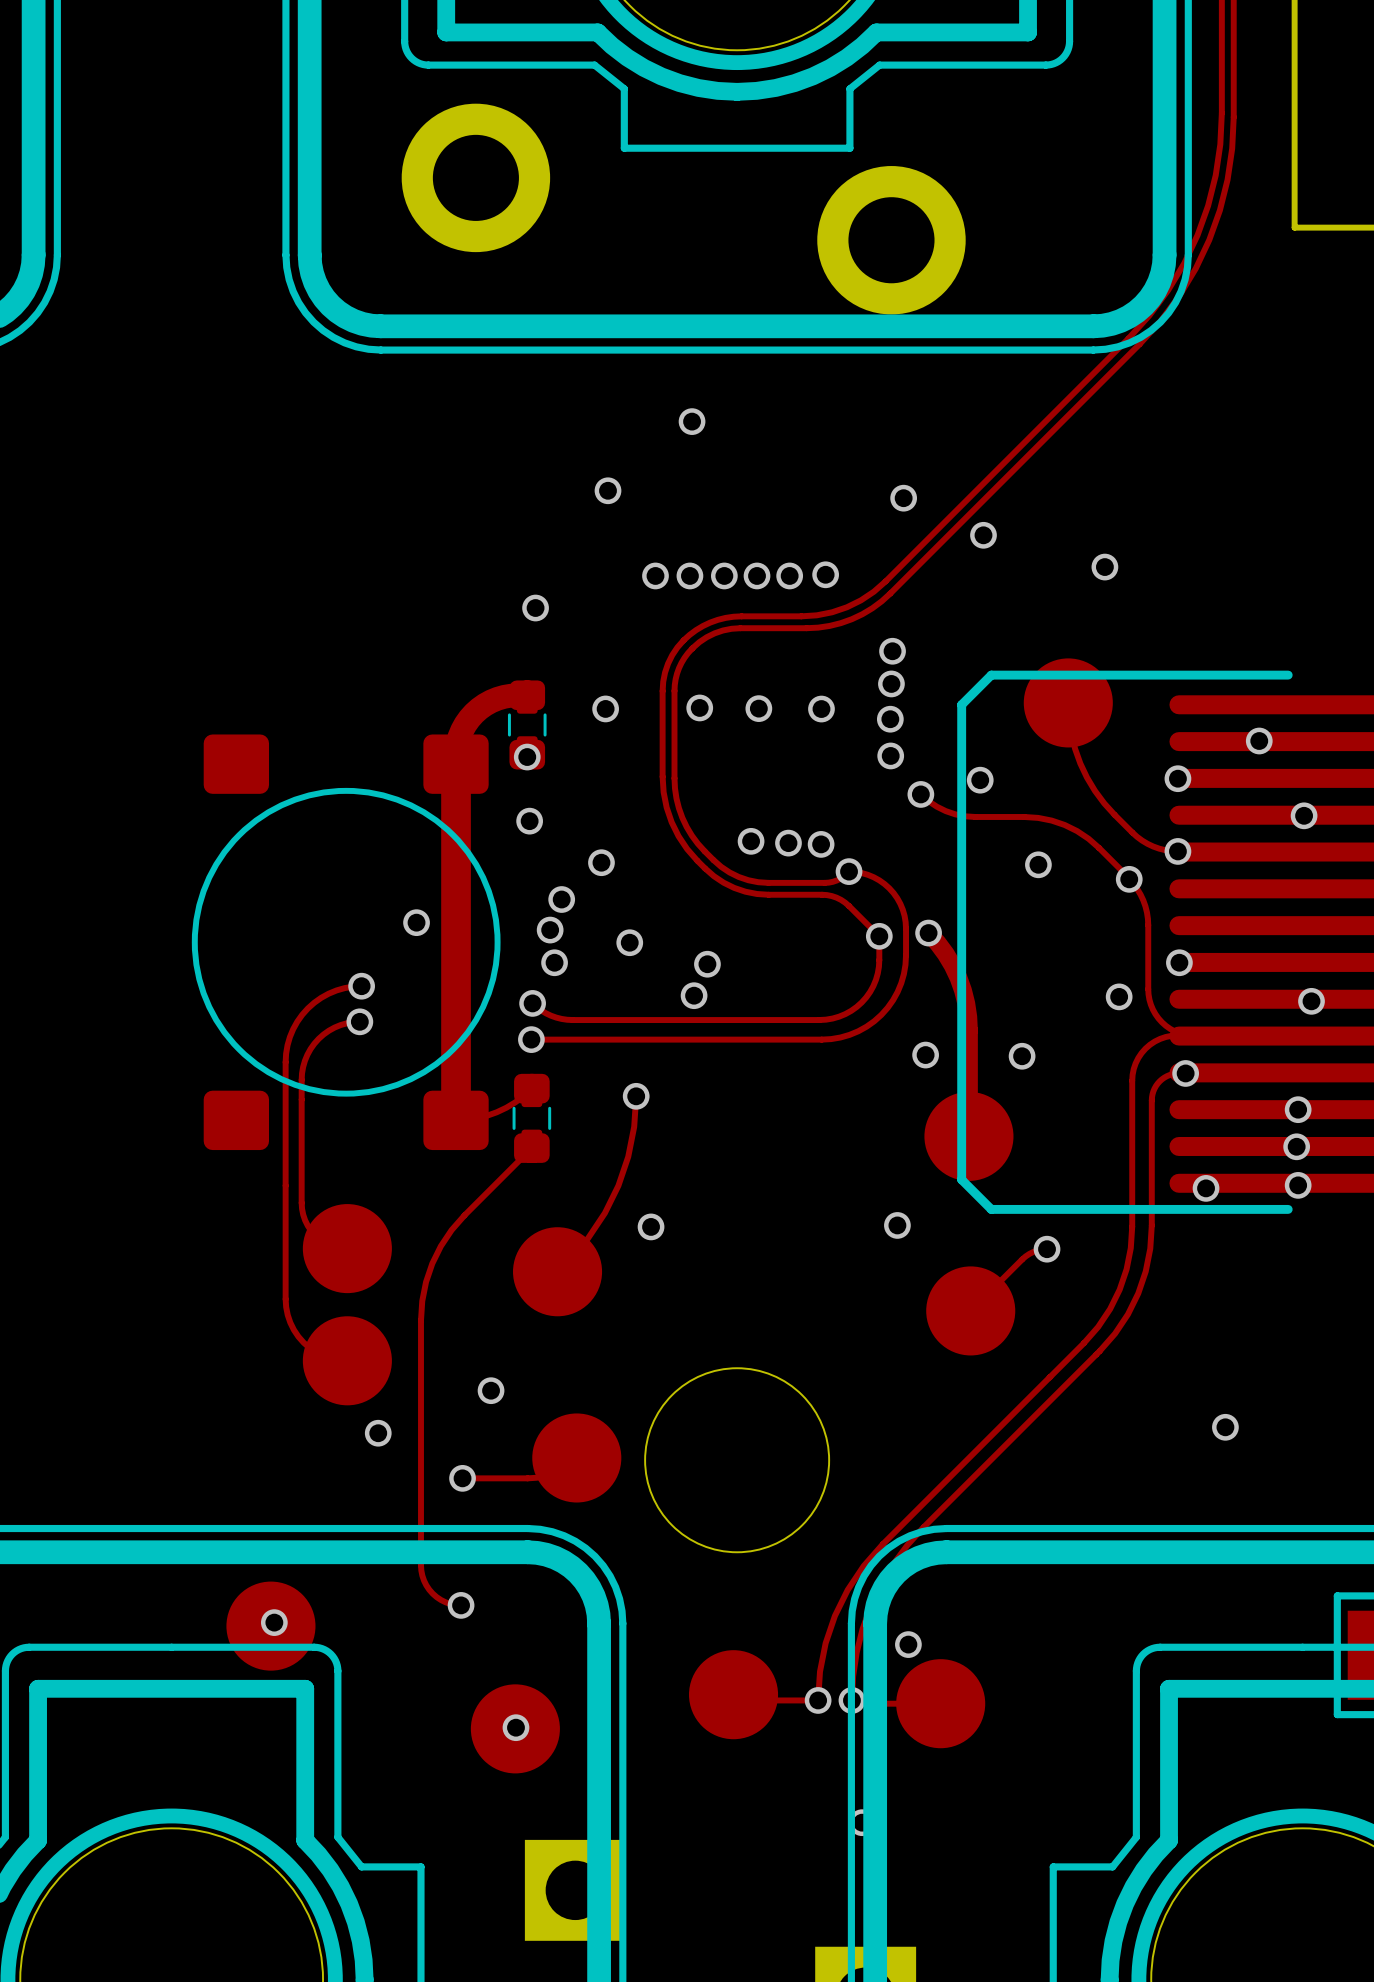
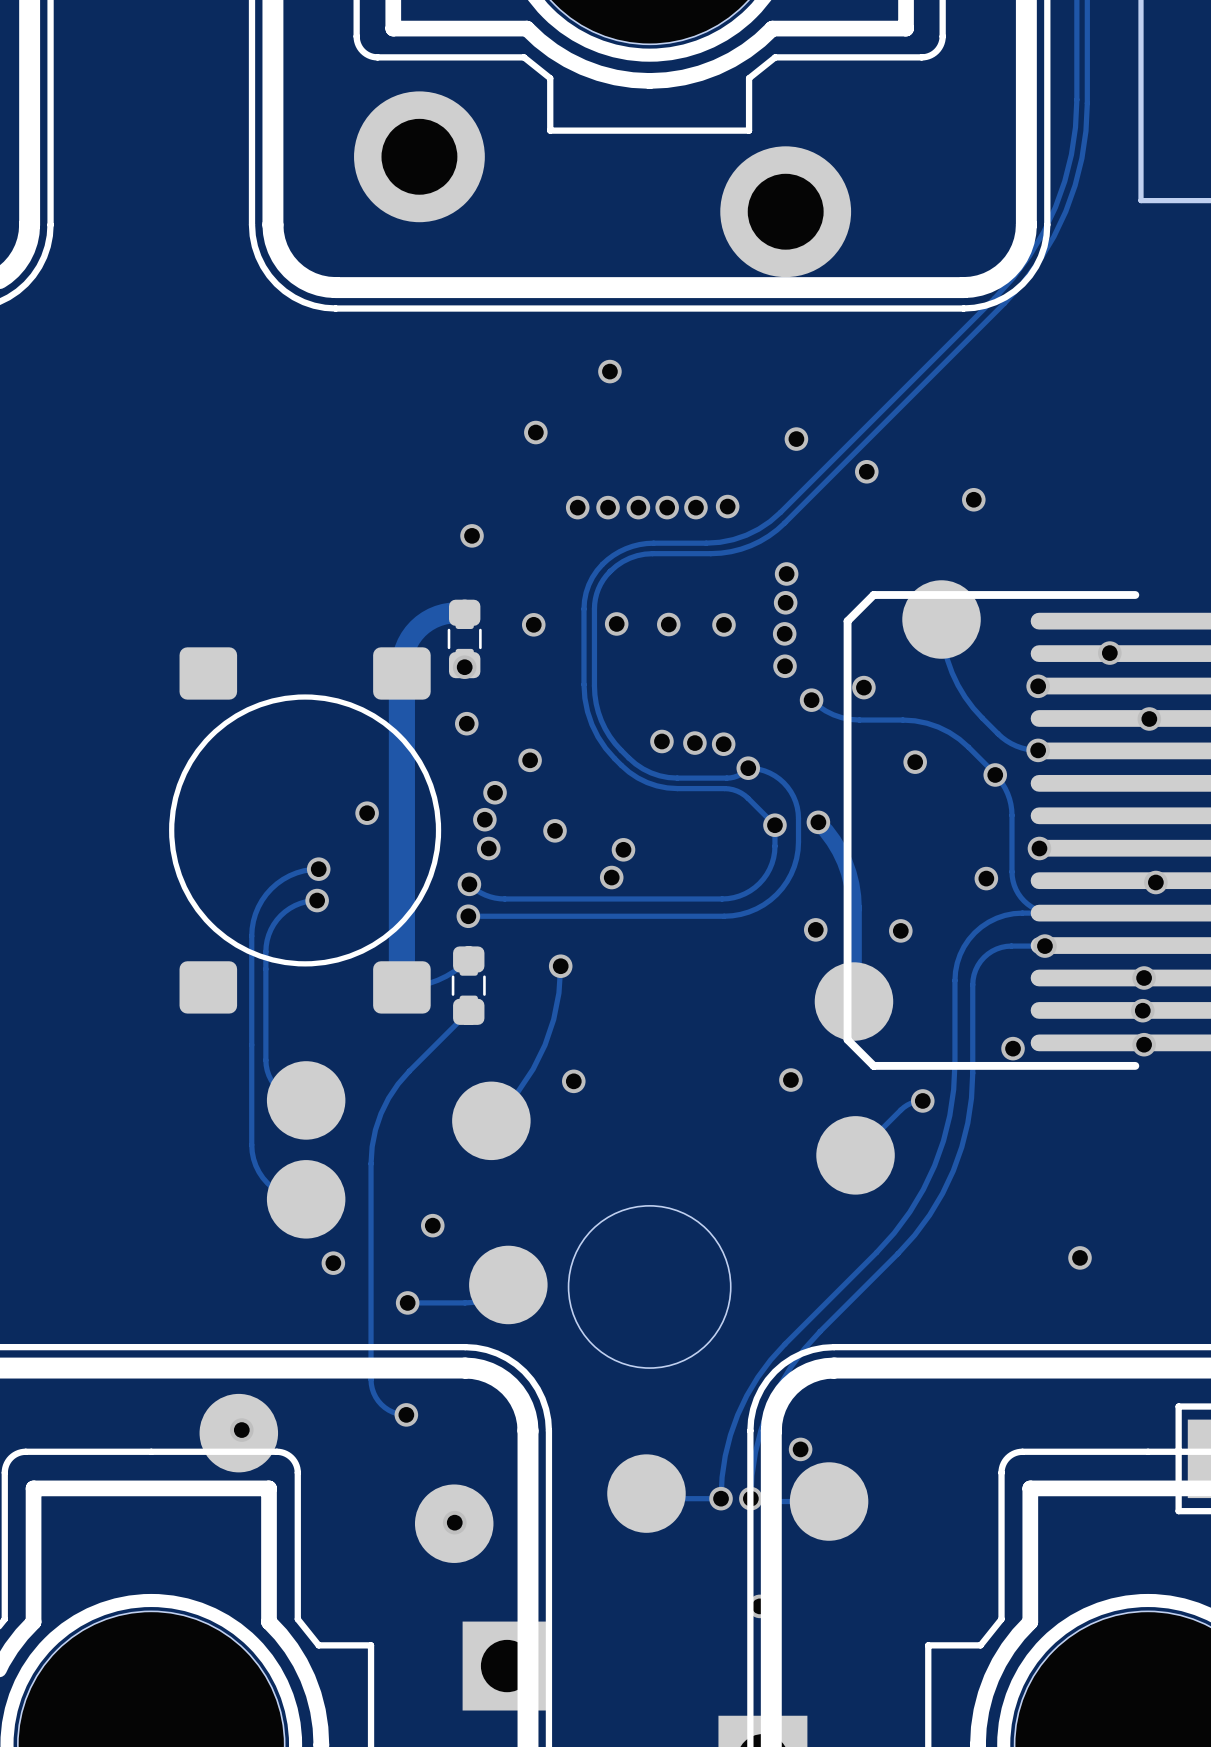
track: (1288, 1036) (1171, 1035) (1154, 1041) (1141, 1053) (1135, 1063) (1132, 1074) (1132, 1226) (1126, 1269) (1110, 1309) (1098, 1326) (1050, 1376) -> none
track: (1178, 1073) (1169, 1074) (1161, 1079) (1155, 1086) (1152, 1094) (1150, 1248) (1145, 1271) (1138, 1293) (1127, 1314) (1115, 1333) (1099, 1351) (923, 1527) (893, 1564) (870, 1606) (862, 1629) (853, 1676) (851, 1700) -> (1038, 946) (1001, 947) (987, 954) (977, 965) (972, 984) (971, 1098) (961, 1147) (953, 1170) (942, 1193) (914, 1235) (820, 1331) (790, 1367) (778, 1387) (761, 1430) (751, 1475) (750, 1498)
via position: (1206, 1188) -> (1013, 1048)
track: (1049, 1377) (882, 1544) (863, 1565) (847, 1589) (834, 1615) (825, 1643) (820, 1671) (818, 1700) -> (1053, 913) (1013, 913) (996, 918) (974, 932) (963, 946) (955, 971) (953, 1089) (943, 1141) (934, 1165) (909, 1212) (894, 1233) (785, 1344) (757, 1377) (746, 1395) (730, 1435) (725, 1456) (721, 1498)

